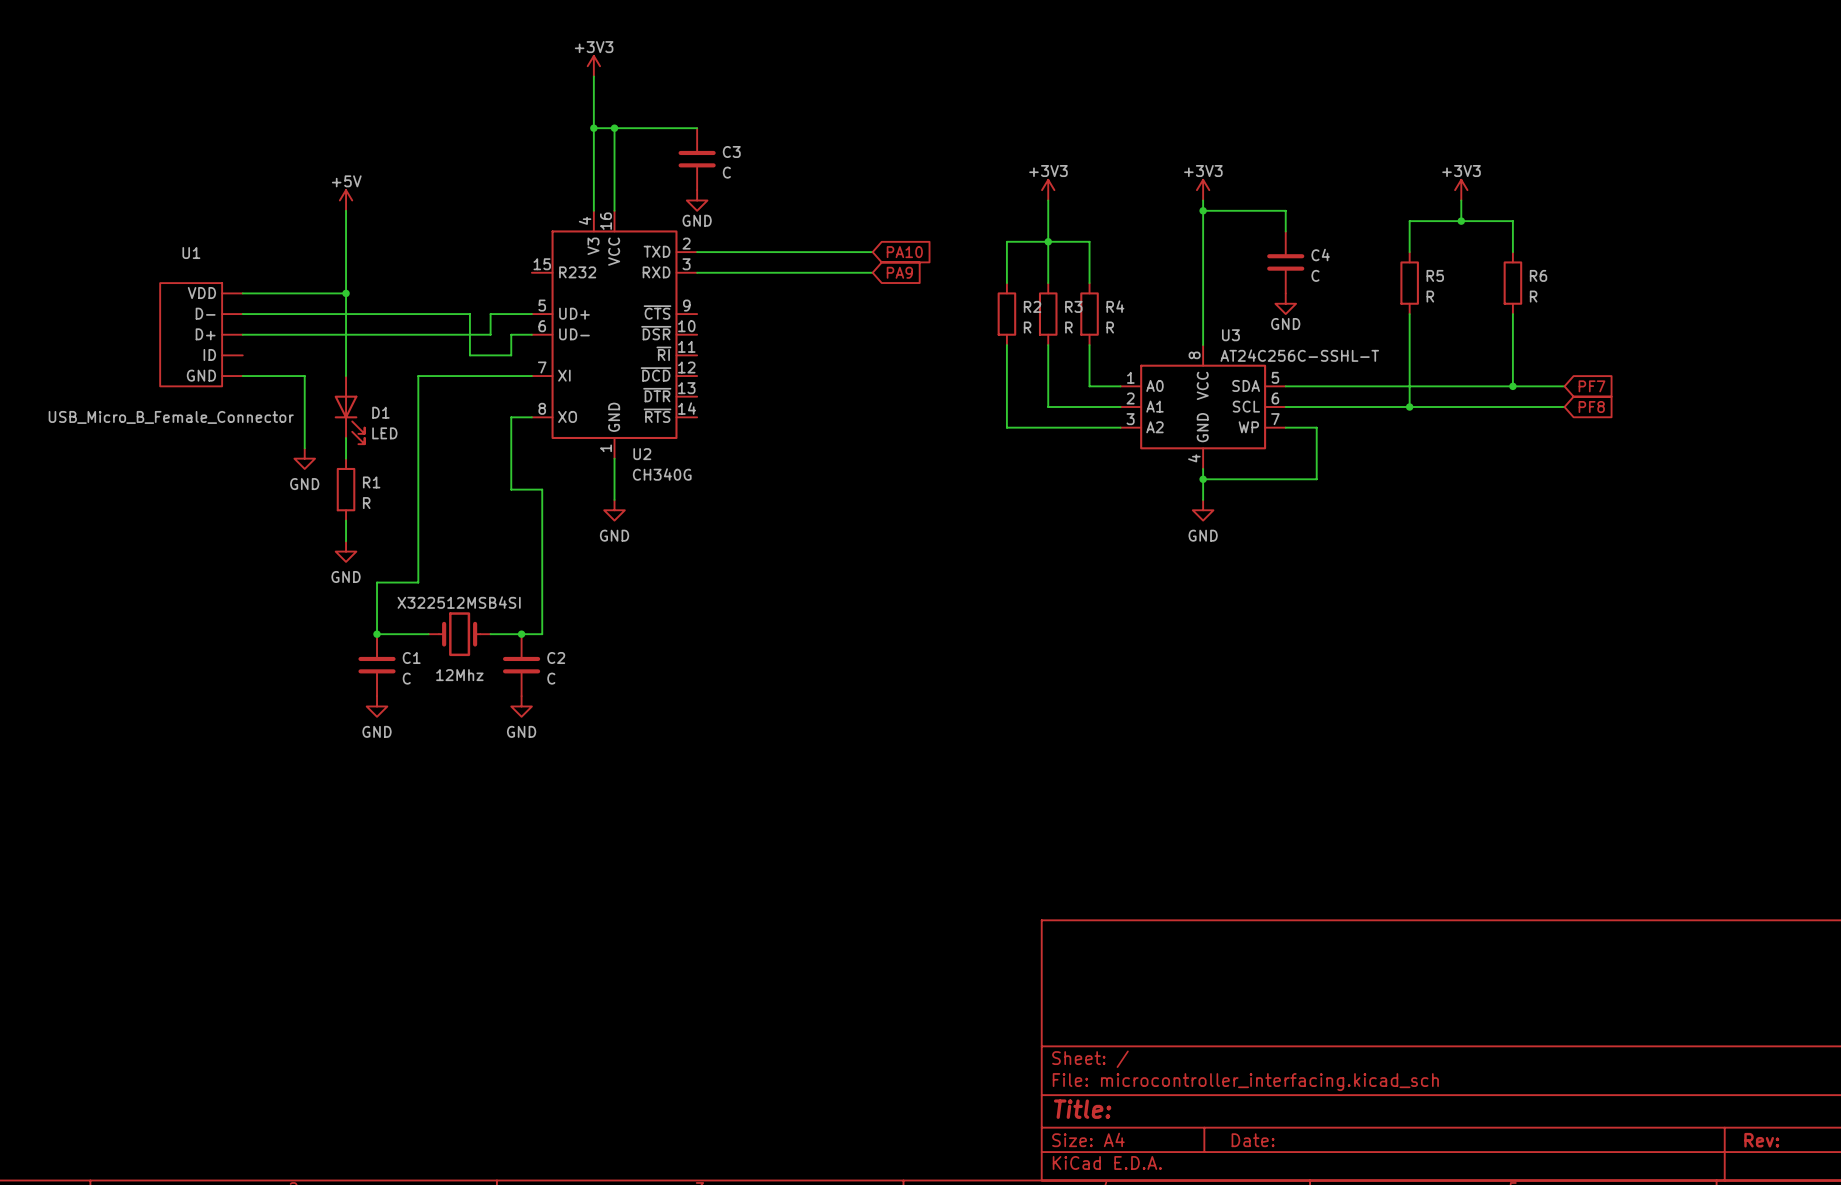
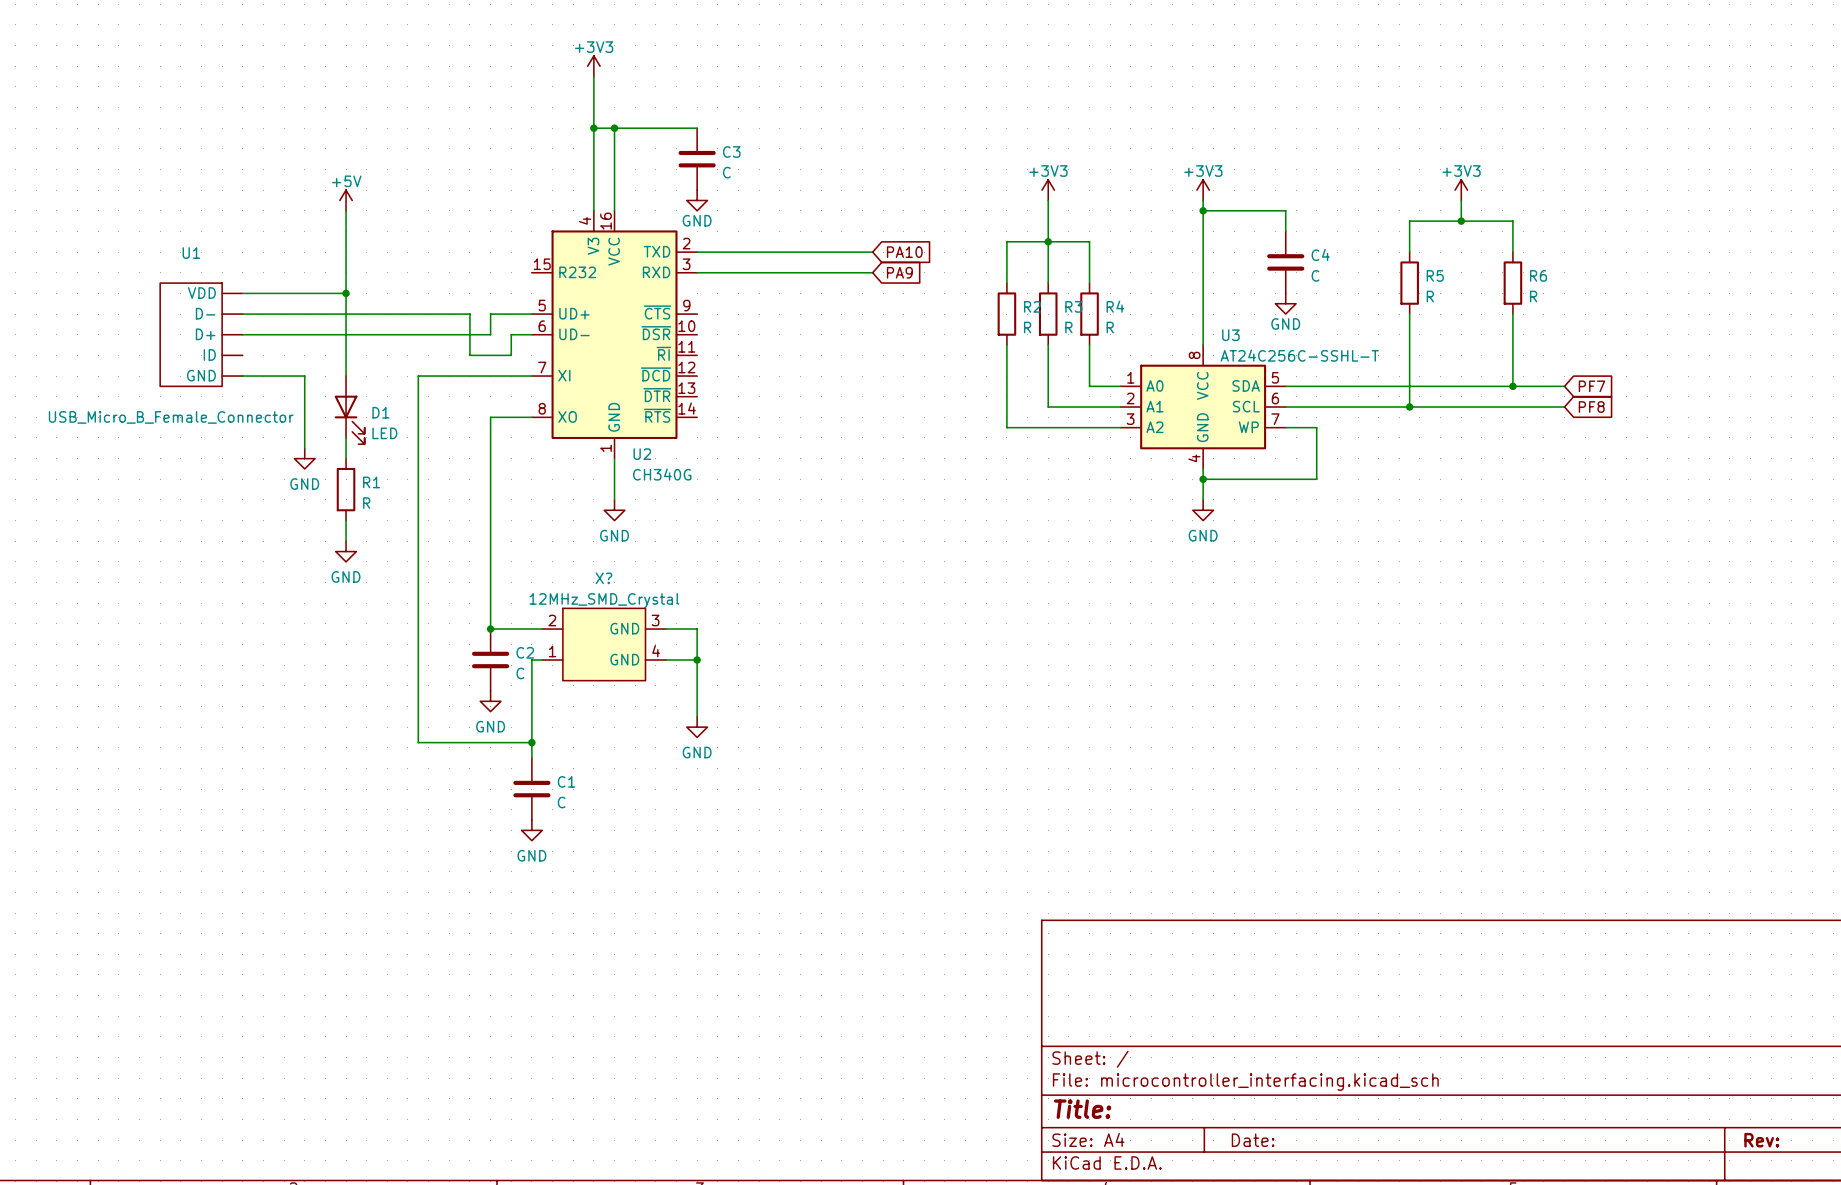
wire: (511, 417) (511, 489) (542, 489) (542, 634) (490, 634) -> (511, 417) (490, 417) (490, 629) (542, 629)
wire: (418, 582) (377, 582) (377, 634) (428, 634) -> (418, 582) (418, 742) (531, 742)
wire: none -> (666, 629) (697, 629) (697, 716)
junction: (377, 634) -> none
X322512MSB4SI: 12Mhz (459, 634) -> none
junction position: (521, 634) -> (490, 629)
X?: none -> 12MHz_SMD_Crystal (604, 644)
wire: none -> (542, 660) (531, 660) (531, 758)
wire: none -> (666, 660) (697, 660)
junction: none -> (697, 660)
C1 position: (377, 665) -> (531, 789)
C2 position: (521, 665) -> (490, 660)
power symbol: GND (377, 706) -> none
power symbol position: GND (521, 706) -> GND (490, 701)
power symbol: none -> GND (697, 727)
junction: none -> (531, 742)
power symbol: none -> GND (531, 830)

